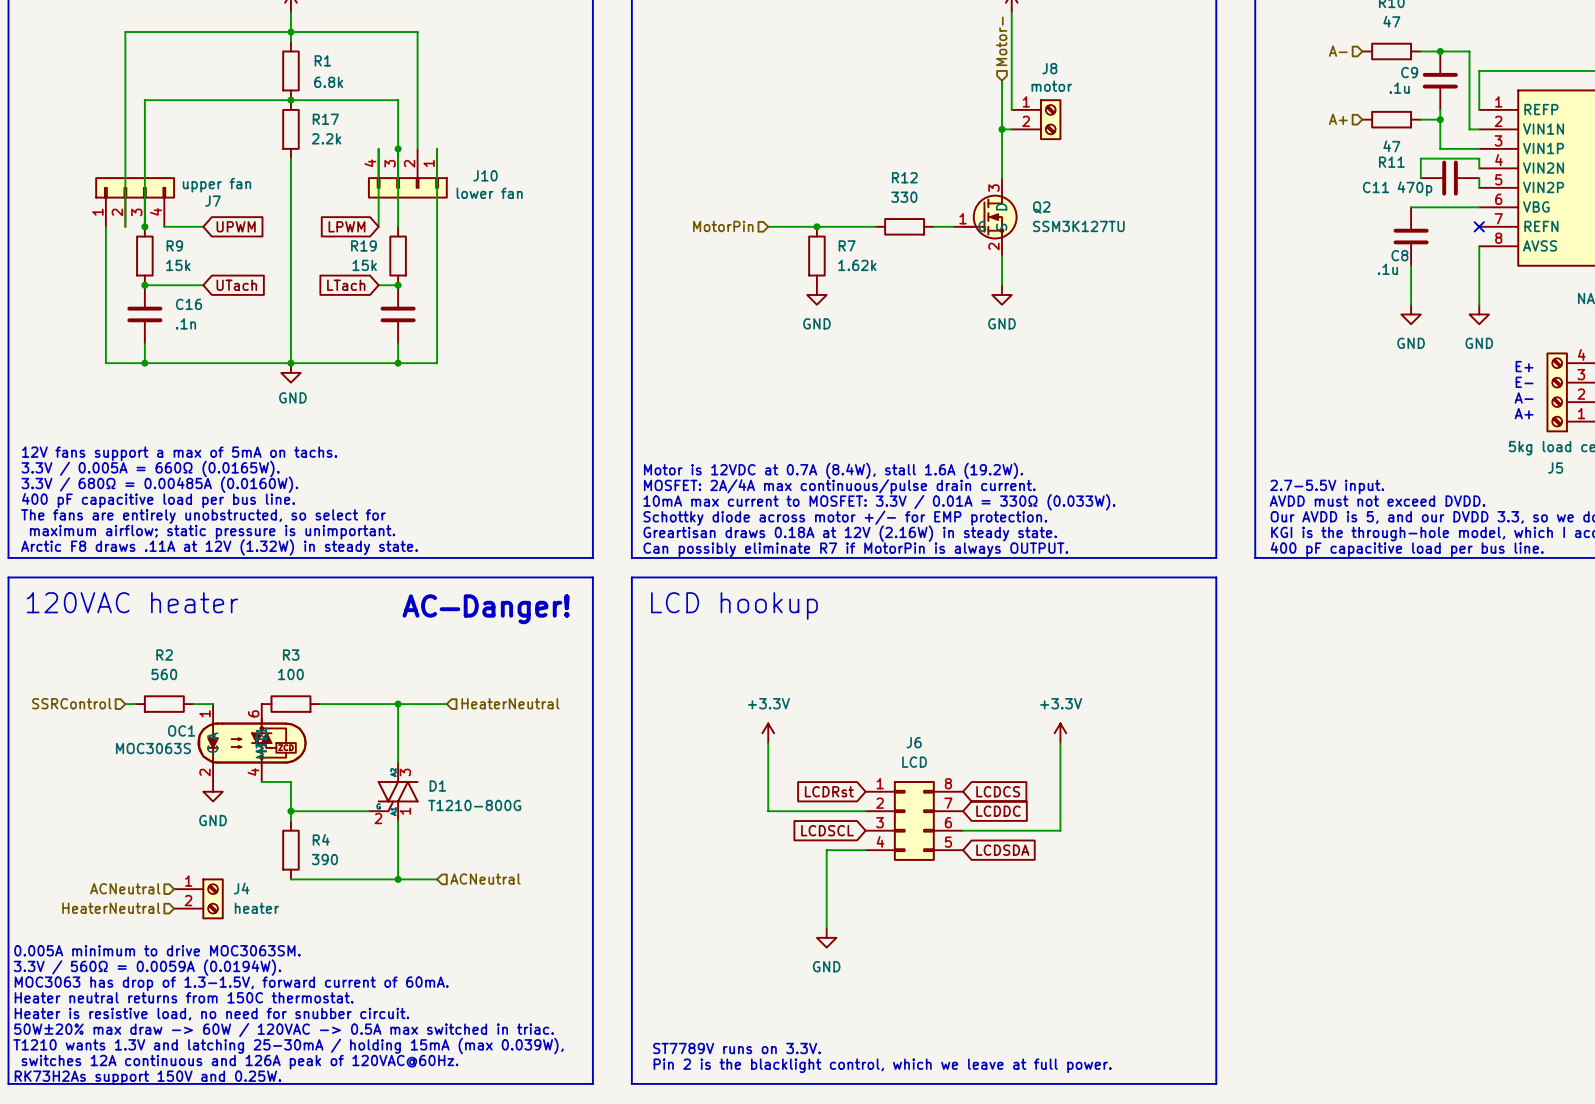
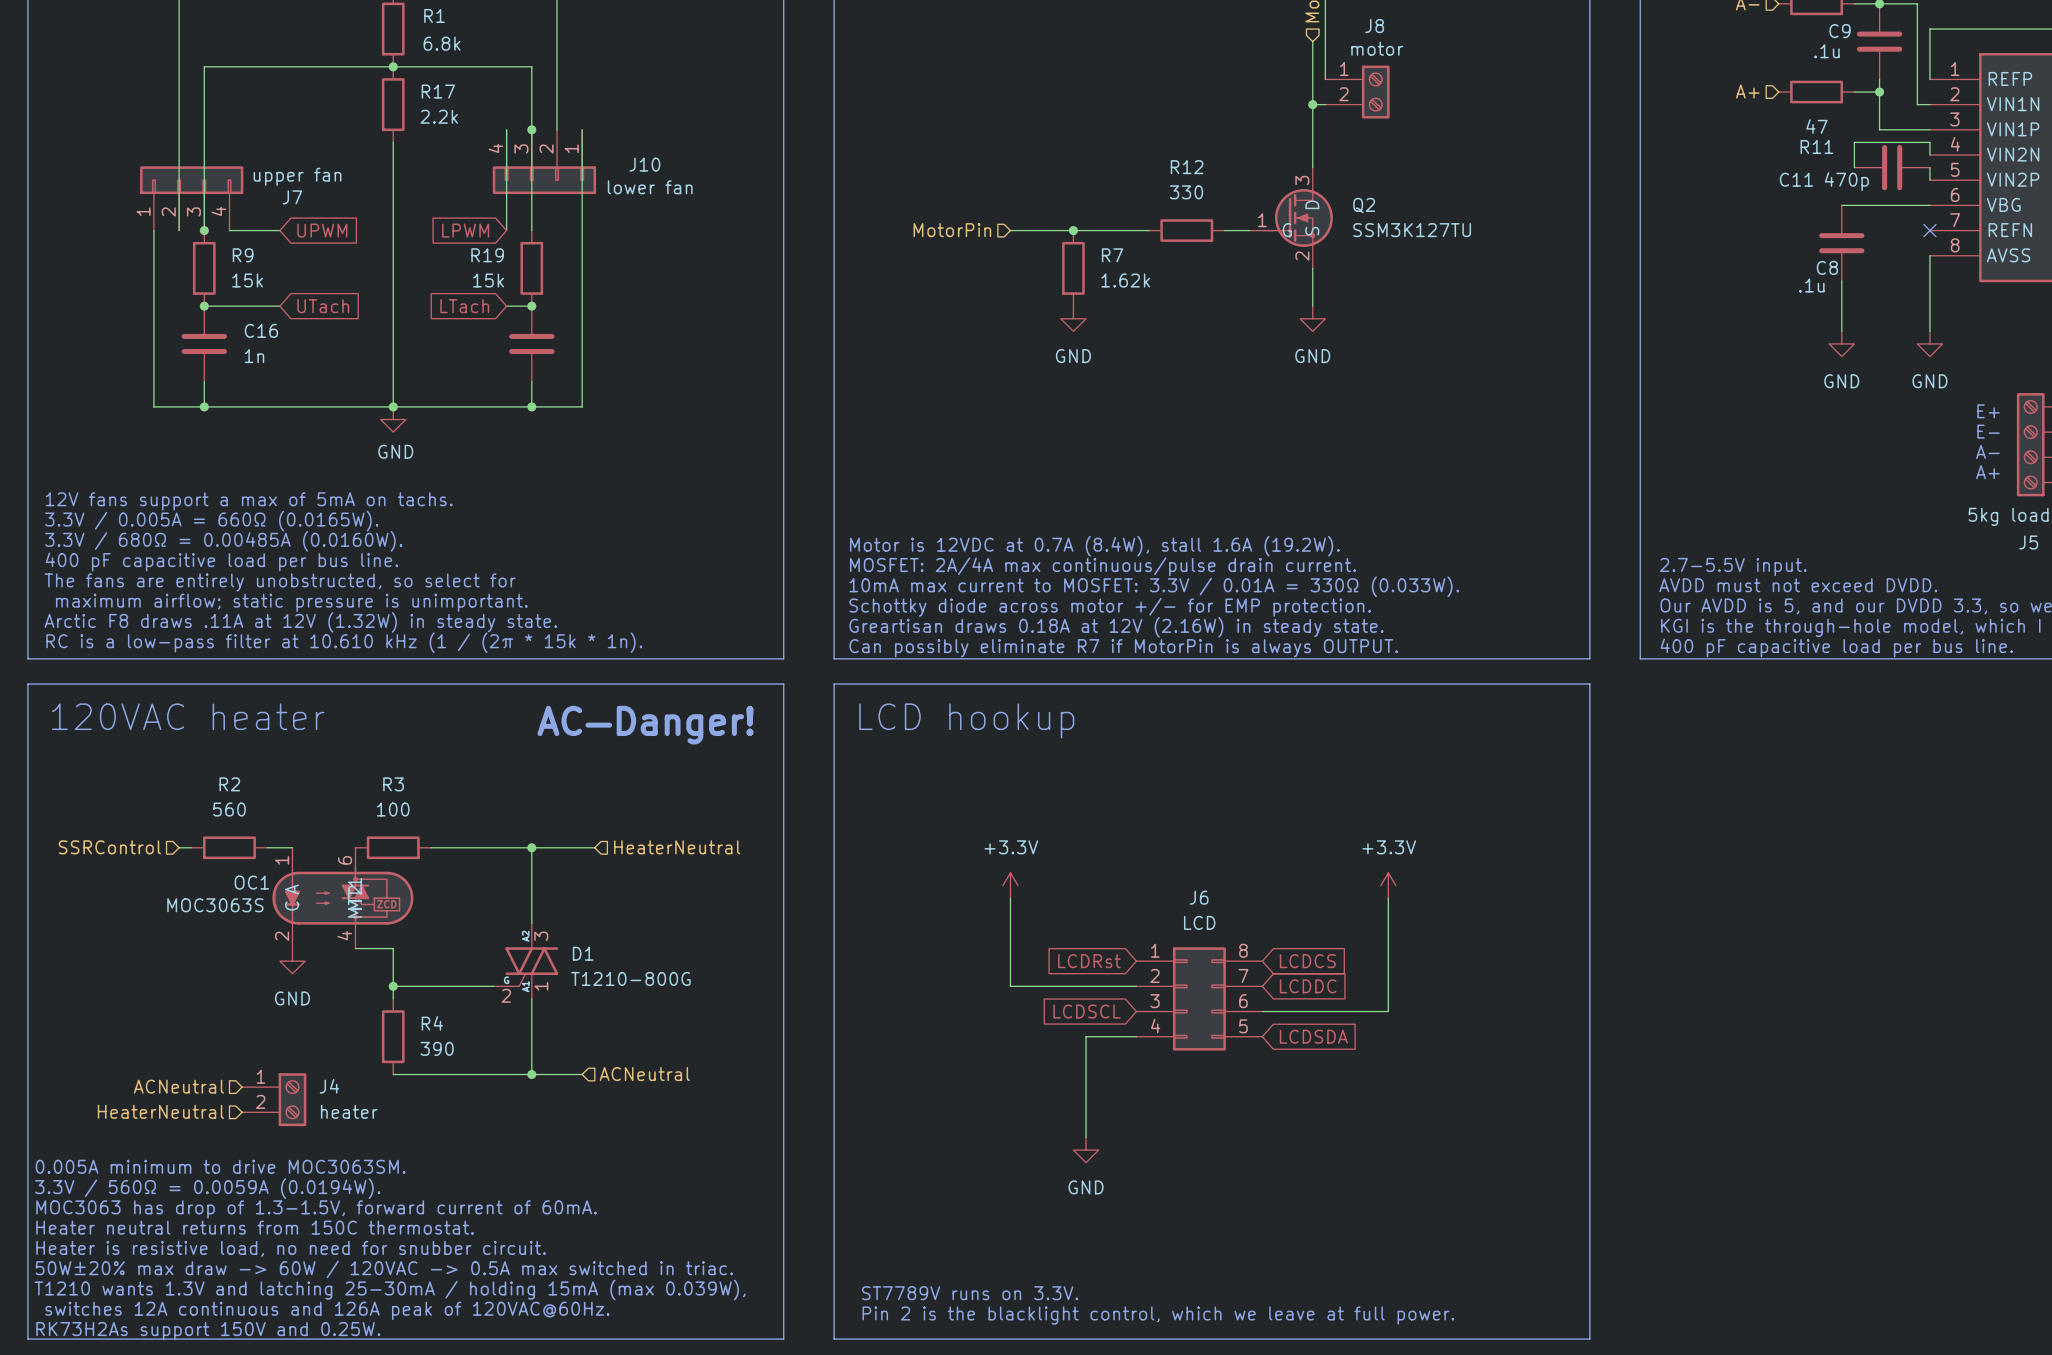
C16 value: .1n (185, 323) -> 1n (254, 356)
text: none -> 12V fans support a max of 5mA on tachs. (249, 501)
text: 12V fans support a max of 5mA on tachs. (179, 453) -> 3.3V / 0.005A = 660Ω (0.0165W). (211, 521)
text: 3.3V / 0.005A = 660Ω (0.0165W). (150, 468) -> 3.3V / 680Ω = 0.00485A (0.0160W). (223, 541)
text: 3.3V / 680Ω = 0.00485A (0.0160W). (159, 484) -> 400 pF capacitive load per bus line. (221, 561)
text: 400 pF capacitive load per bus line. (158, 500) -> The fans are entirely unobstructed, so select for (280, 582)
text: The fans are entirely unobstructed, so select for (203, 516) -> maximum airflow; static pressure is unimportant. (291, 602)
text: maximum airflow; static pressure is unimportant. (212, 532) -> Arctic F8 draws .11A at 12V (1.32W) in steady state. (300, 622)
text: Arctic F8 draws .11A at 12V (1.32W) in steady state. (219, 547) -> RC is a low-pass filter at 10.610 kHz (1 / (2π * 15k * 1n). (344, 642)

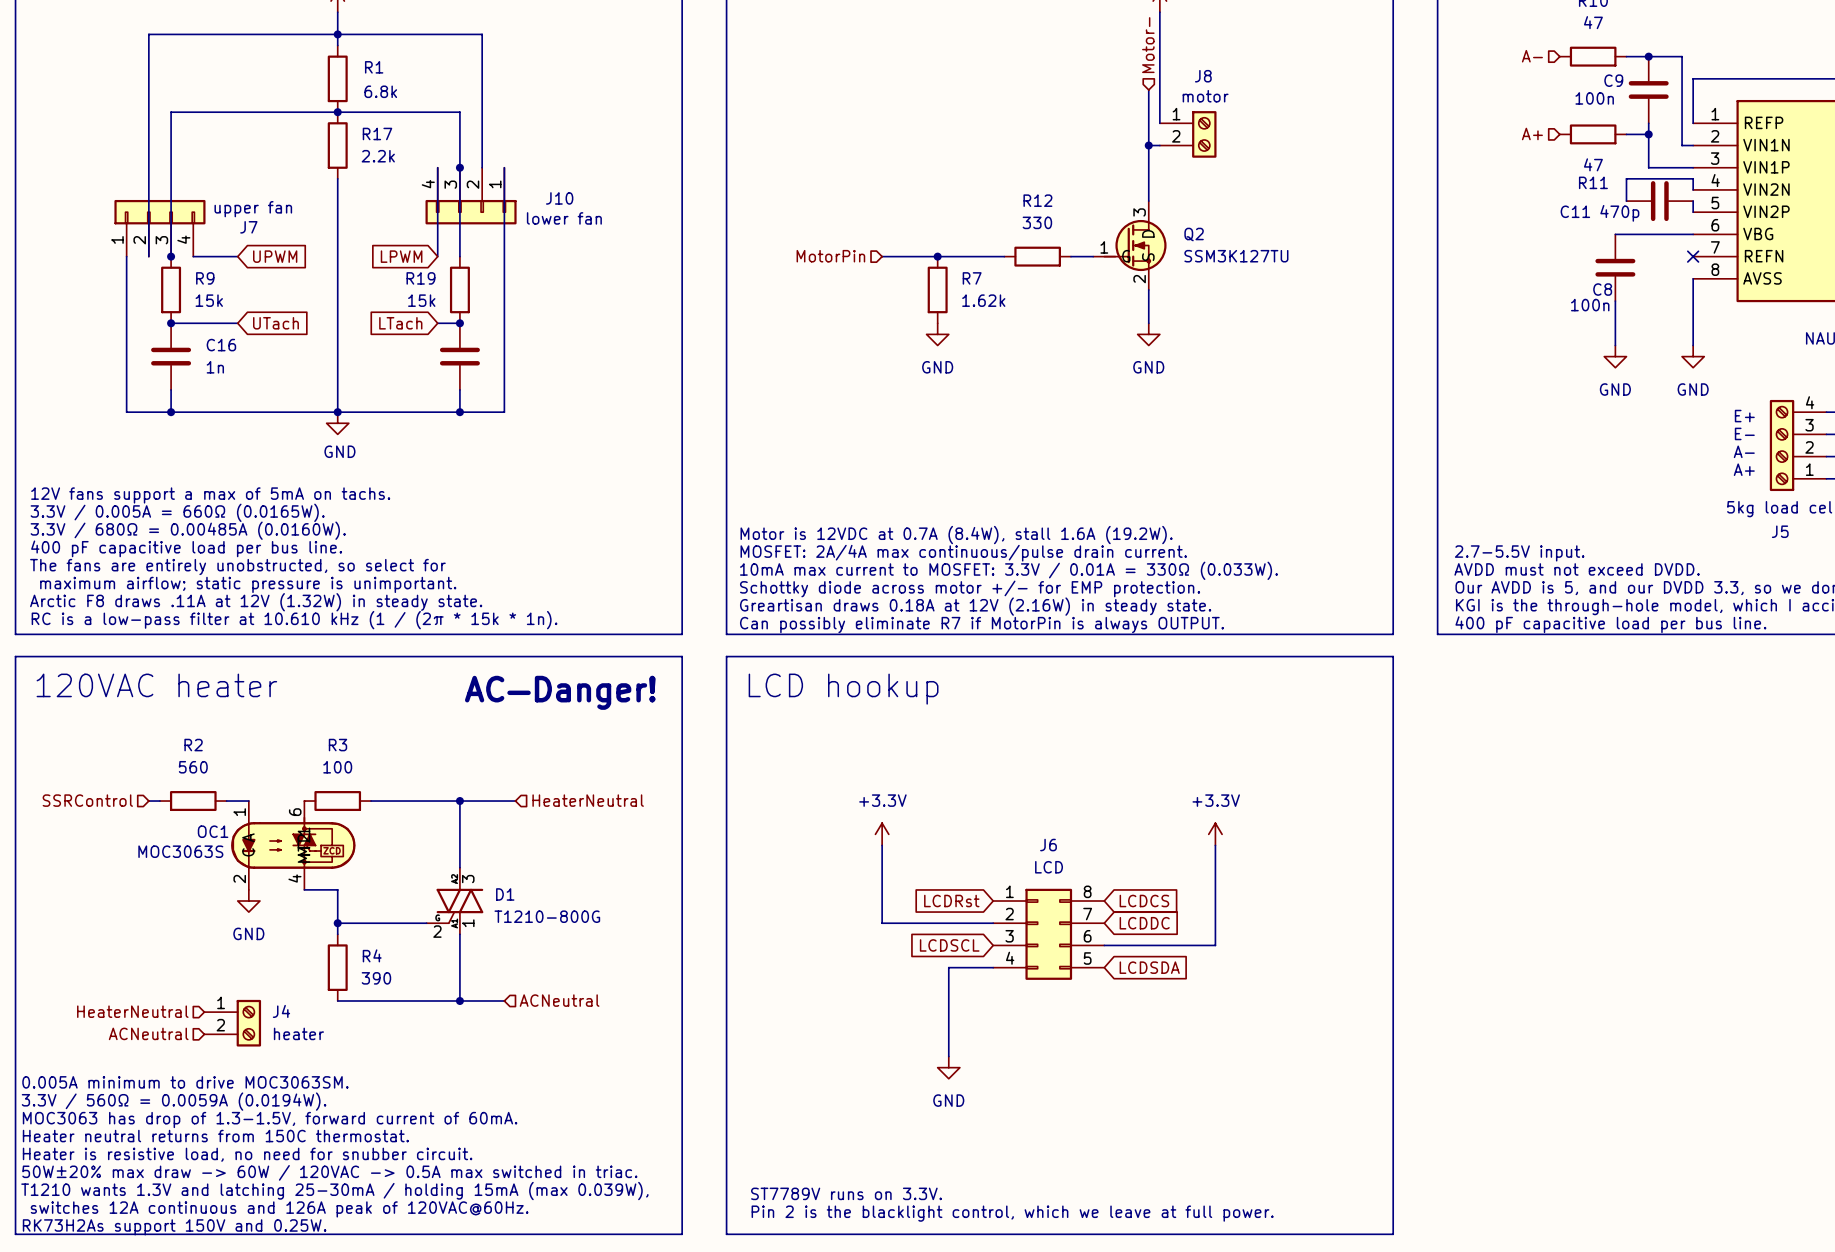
C9 value: .1u (1826, 51) -> 100n (1594, 98)
C8 value: .1u (1811, 285) -> 100n (1590, 305)
hierarchical label: ACNeutral (178, 1086) -> HeaterNeutral (132, 1011)
hierarchical label: HeaterNeutral (160, 1111) -> ACNeutral (148, 1033)

